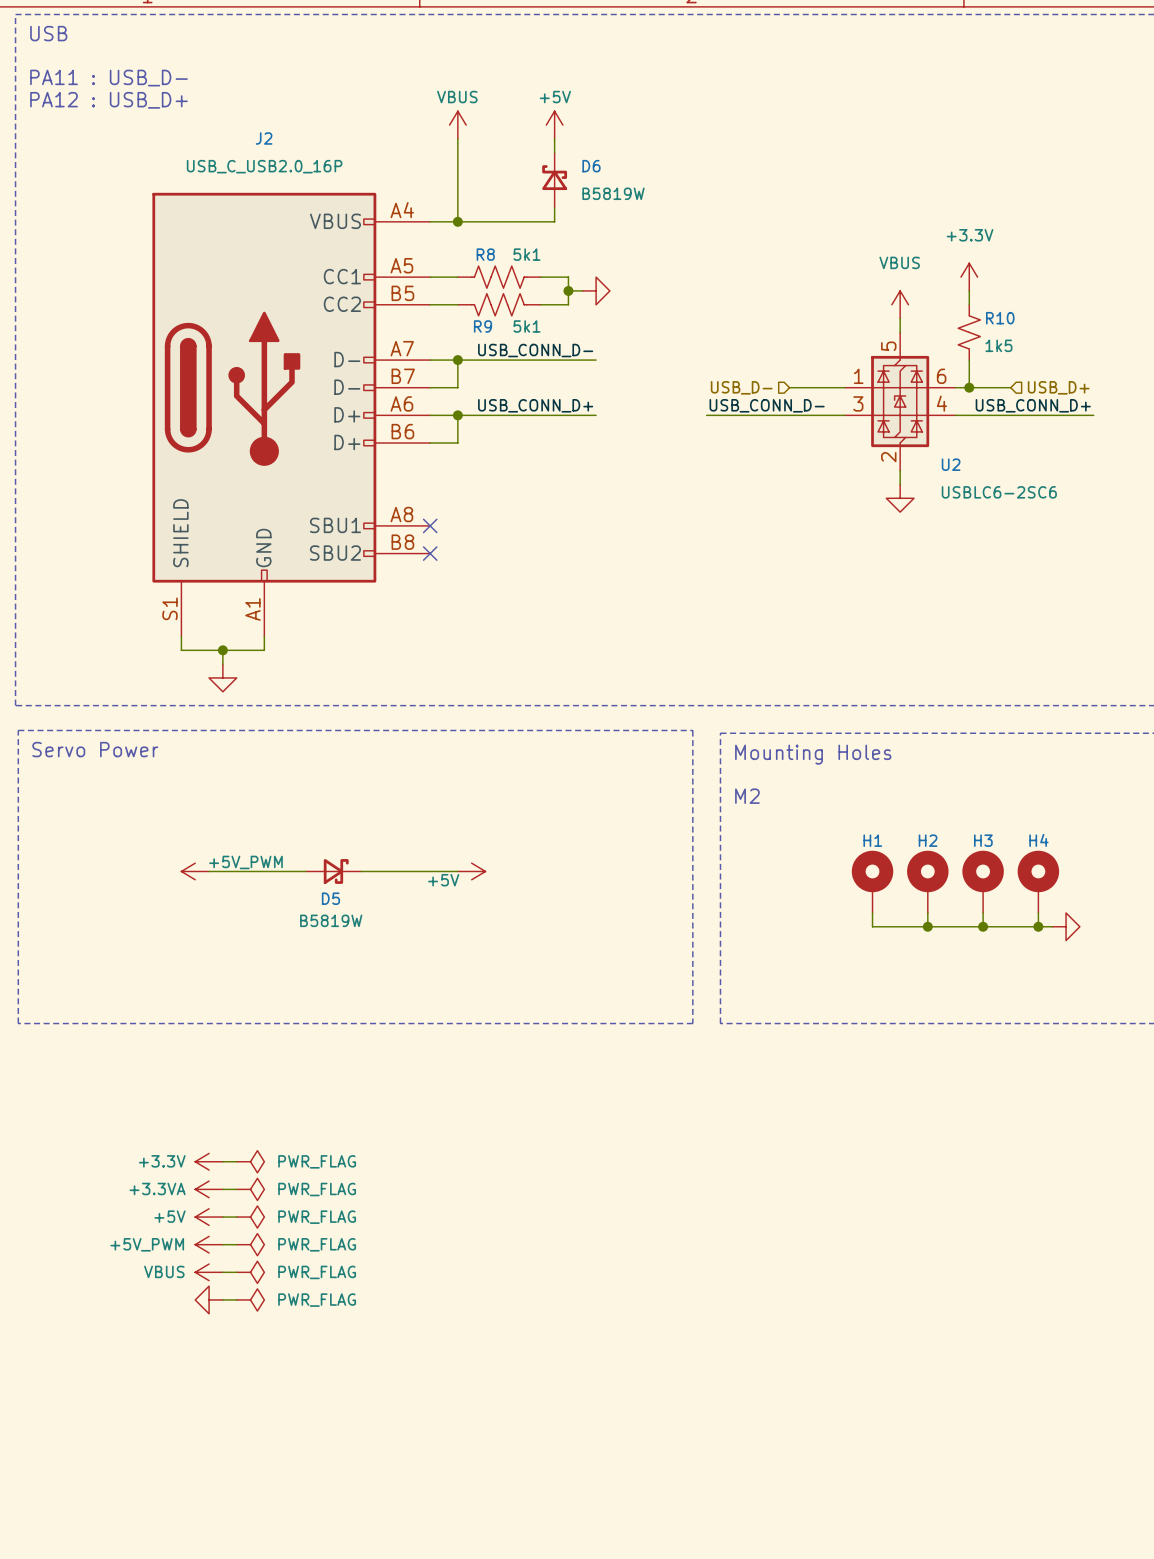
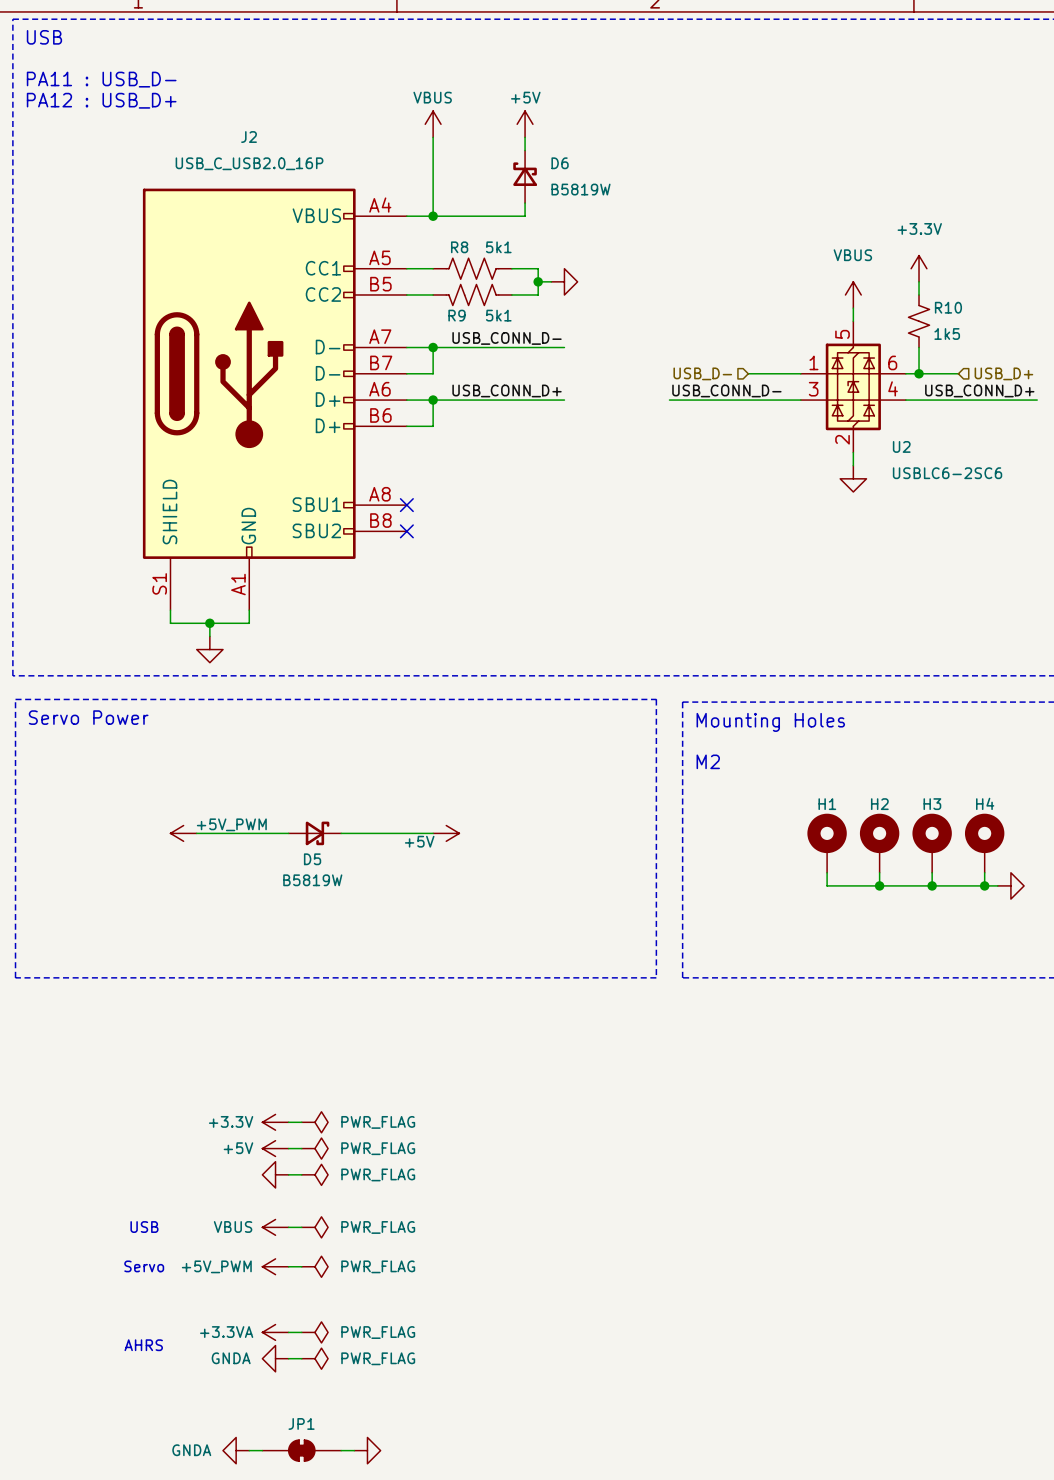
power symbol position: +3.3V (209, 1161) -> +3.3V (275, 1122)
wire: (222, 1161) (236, 1161) -> (288, 1122) (301, 1122)
power symbol: PWR_FLAG (250, 1161) -> none
power symbol: none -> PWR_FLAG (314, 1122)
power symbol position: +3.3VA (209, 1189) -> +3.3VA (275, 1332)
wire: (222, 1189) (236, 1189) -> (288, 1148) (301, 1148)
power symbol: PWR_FLAG (250, 1189) -> none
power symbol: none -> PWR_FLAG (314, 1148)
power symbol position: +5V (209, 1217) -> +5V (275, 1148)
wire: (222, 1217) (236, 1217) -> (288, 1174) (301, 1174)
power symbol: PWR_FLAG (250, 1217) -> none
power symbol: none -> PWR_FLAG (314, 1174)
power symbol position: +5V_PWM (209, 1244) -> +5V_PWM (275, 1266)
wire: (222, 1244) (236, 1244) -> (288, 1332) (301, 1332)
power symbol: PWR_FLAG (250, 1244) -> none
power symbol position: VBUS (209, 1272) -> VBUS (275, 1227)
wire: (222, 1272) (236, 1272) -> (288, 1227) (301, 1227)
power symbol: PWR_FLAG (250, 1272) -> none
text: none -> USB (144, 1227)
power symbol: none -> PWR_FLAG (314, 1227)
power symbol position: (209, 1299) -> (275, 1174)
wire: (222, 1299) (236, 1299) -> (288, 1358) (301, 1358)
power symbol: PWR_FLAG (250, 1299) -> none
text: none -> Servo (144, 1266)
wire: none -> (288, 1266) (301, 1266)
power symbol: none -> PWR_FLAG (314, 1266)
power symbol: none -> PWR_FLAG (314, 1332)
text: none -> AHRS (143, 1345)
power symbol: none -> GNDA (275, 1358)
power symbol: none -> PWR_FLAG (314, 1358)
power symbol: none -> GNDA (236, 1450)
wire: none -> (249, 1450) (262, 1450)
JP1: none -> (301, 1450)
wire: none -> (341, 1450) (354, 1450)
power symbol: none -> (367, 1450)

